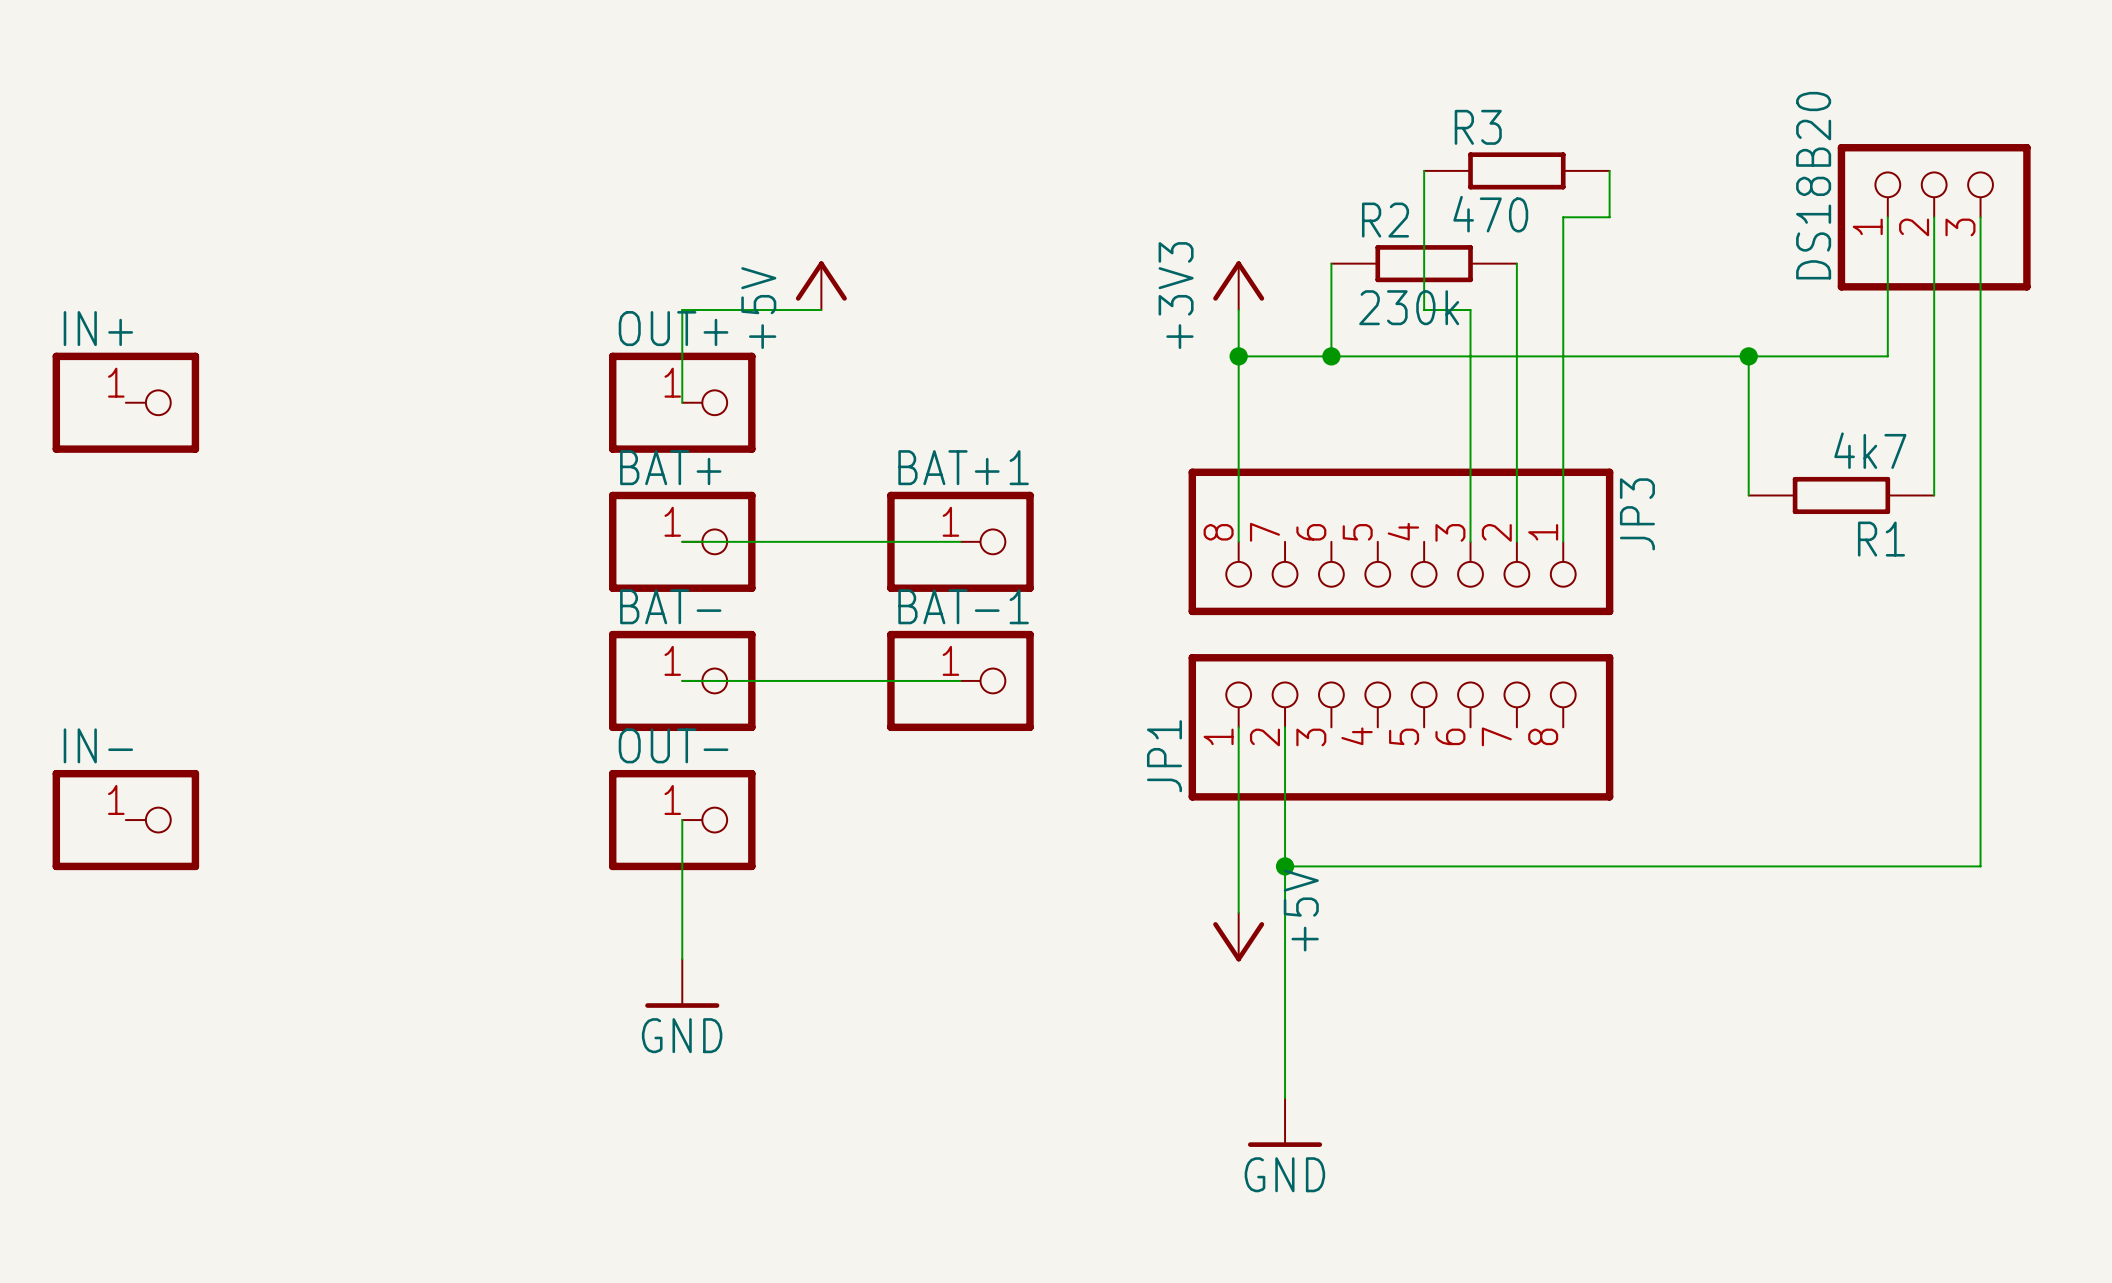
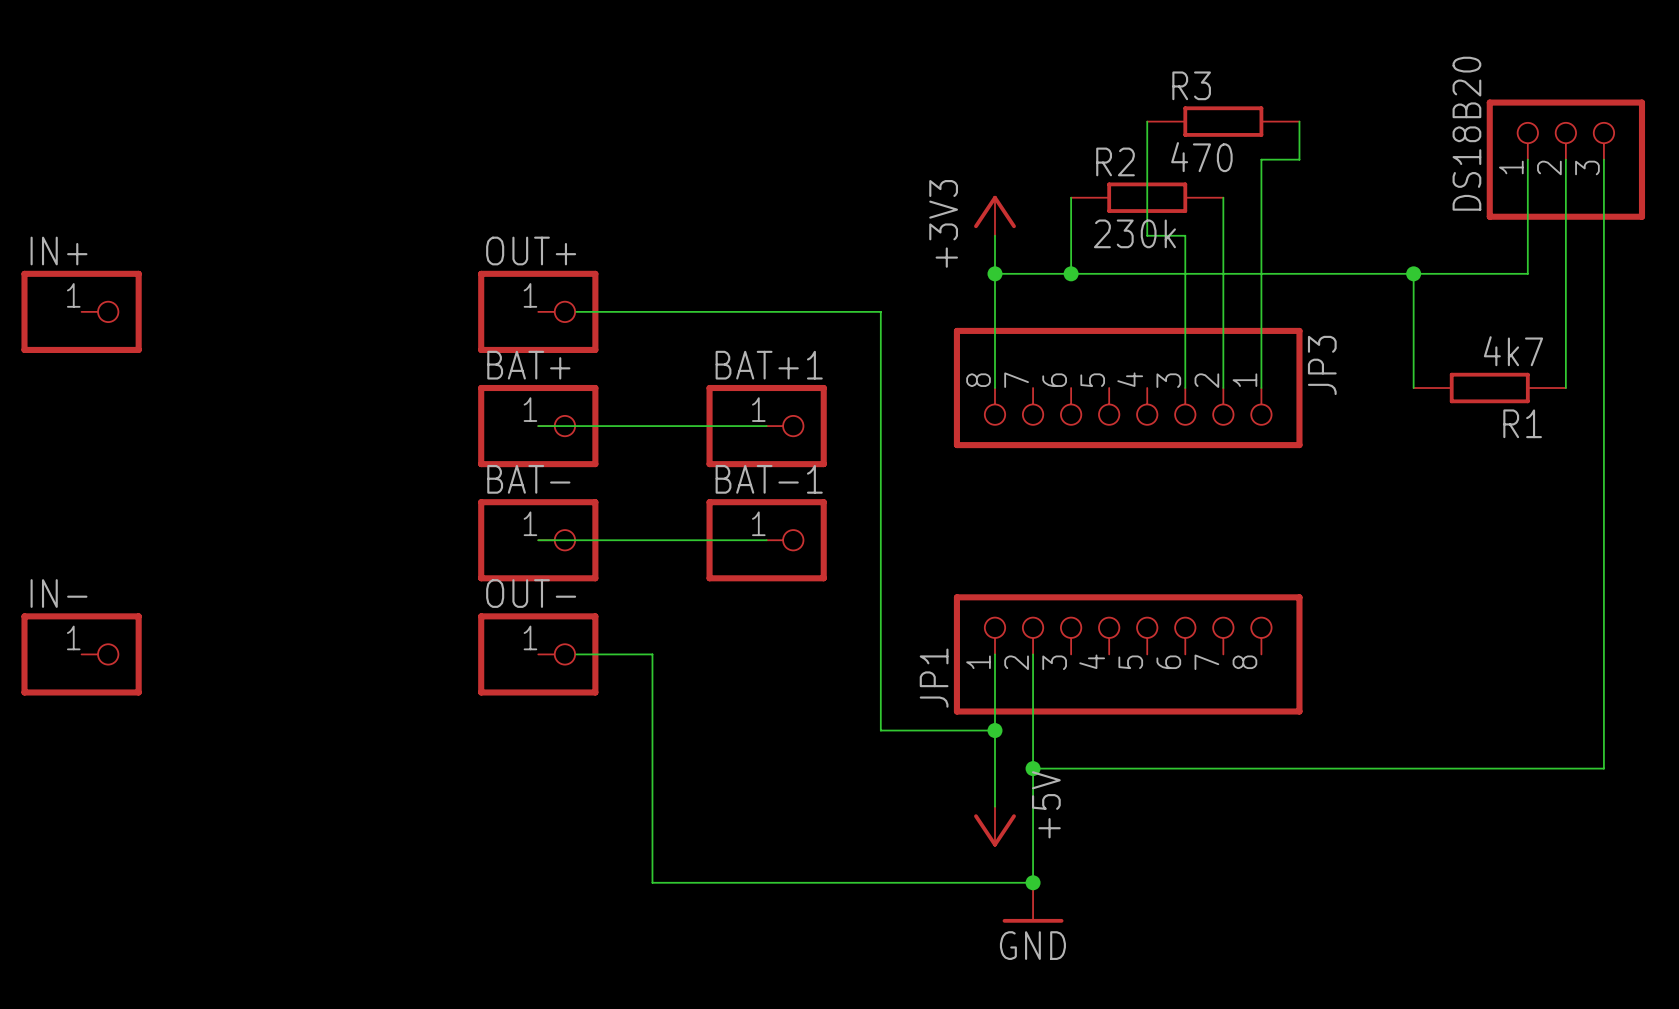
power symbol: +5V (821, 285) -> none
wire: (821, 310) (682, 310) (682, 402) -> none
wire: none -> (576, 311) (880, 311) (880, 730) (995, 730) (995, 806)
wire: (1238, 495) (1238, 541) -> none
wire: (1470, 495) (1470, 541) -> none
wire: (1516, 495) (1516, 541) -> none
wire: (1563, 495) (1563, 541) -> none
JP3 position: (1400, 541) -> (1128, 388)
wire: (1238, 727) (1238, 820) -> none
wire: (1285, 727) (1285, 820) -> none
JP1 position: (1400, 727) -> (1128, 654)
wire: (682, 820) (682, 959) -> none
wire: none -> (576, 654) (652, 654) (652, 882) (1033, 882)
wire: (1285, 866) (1980, 866) -> (1033, 768) (1603, 768) (1603, 692)
junction: (1285, 866) -> none
junction: none -> (995, 730)
power symbol position: +5V (1238, 937) -> +5V (995, 826)
junction: none -> (1033, 768)
power symbol: GND (682, 983) -> none
junction: none -> (1033, 882)

